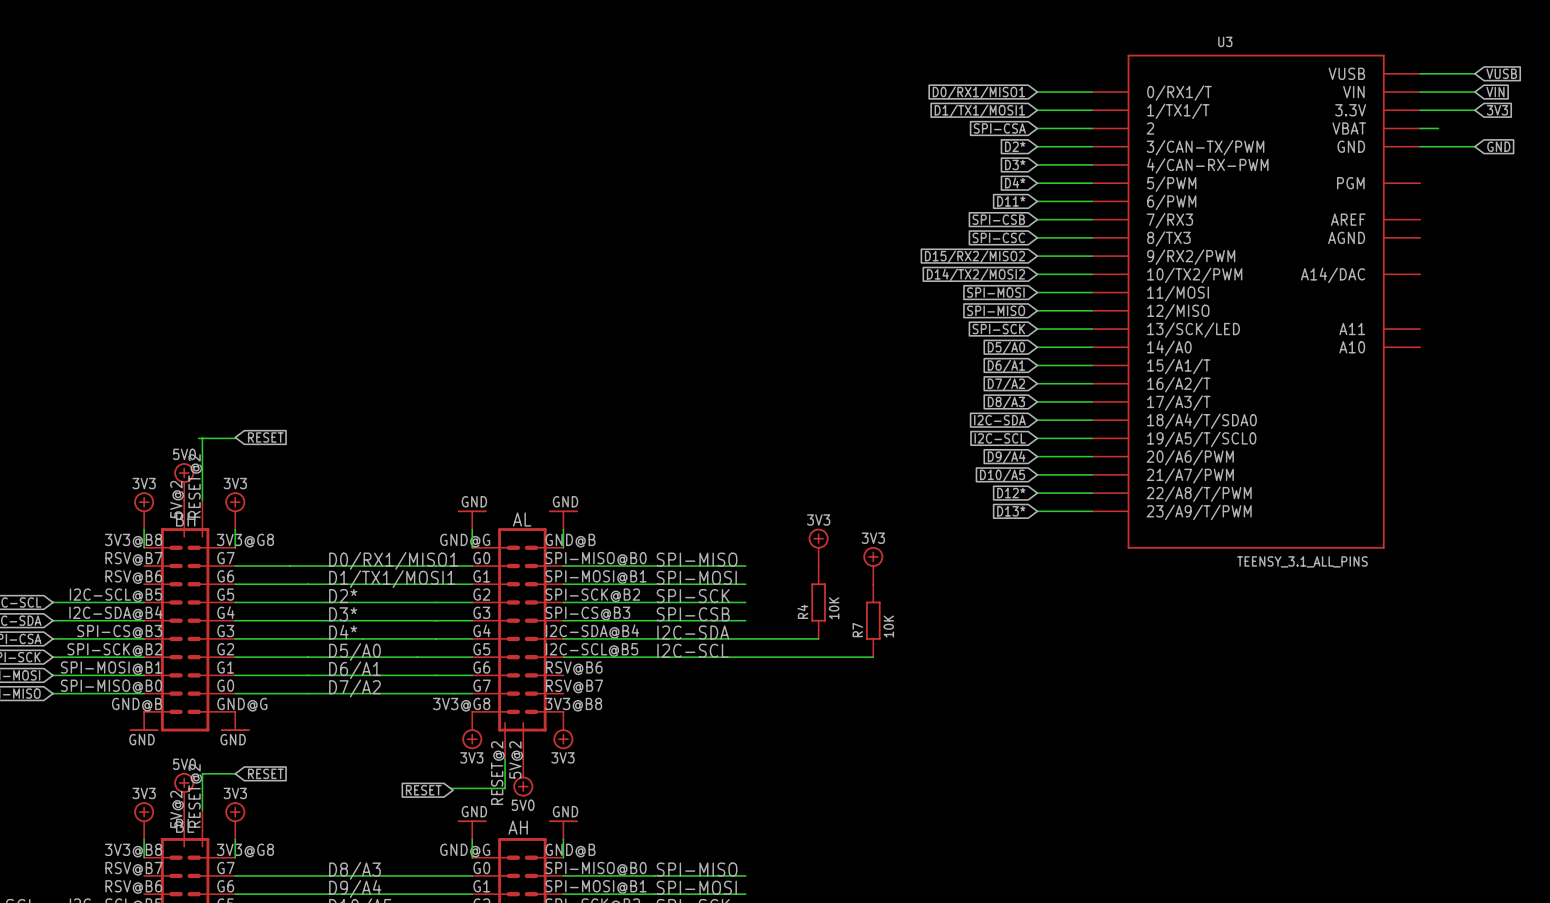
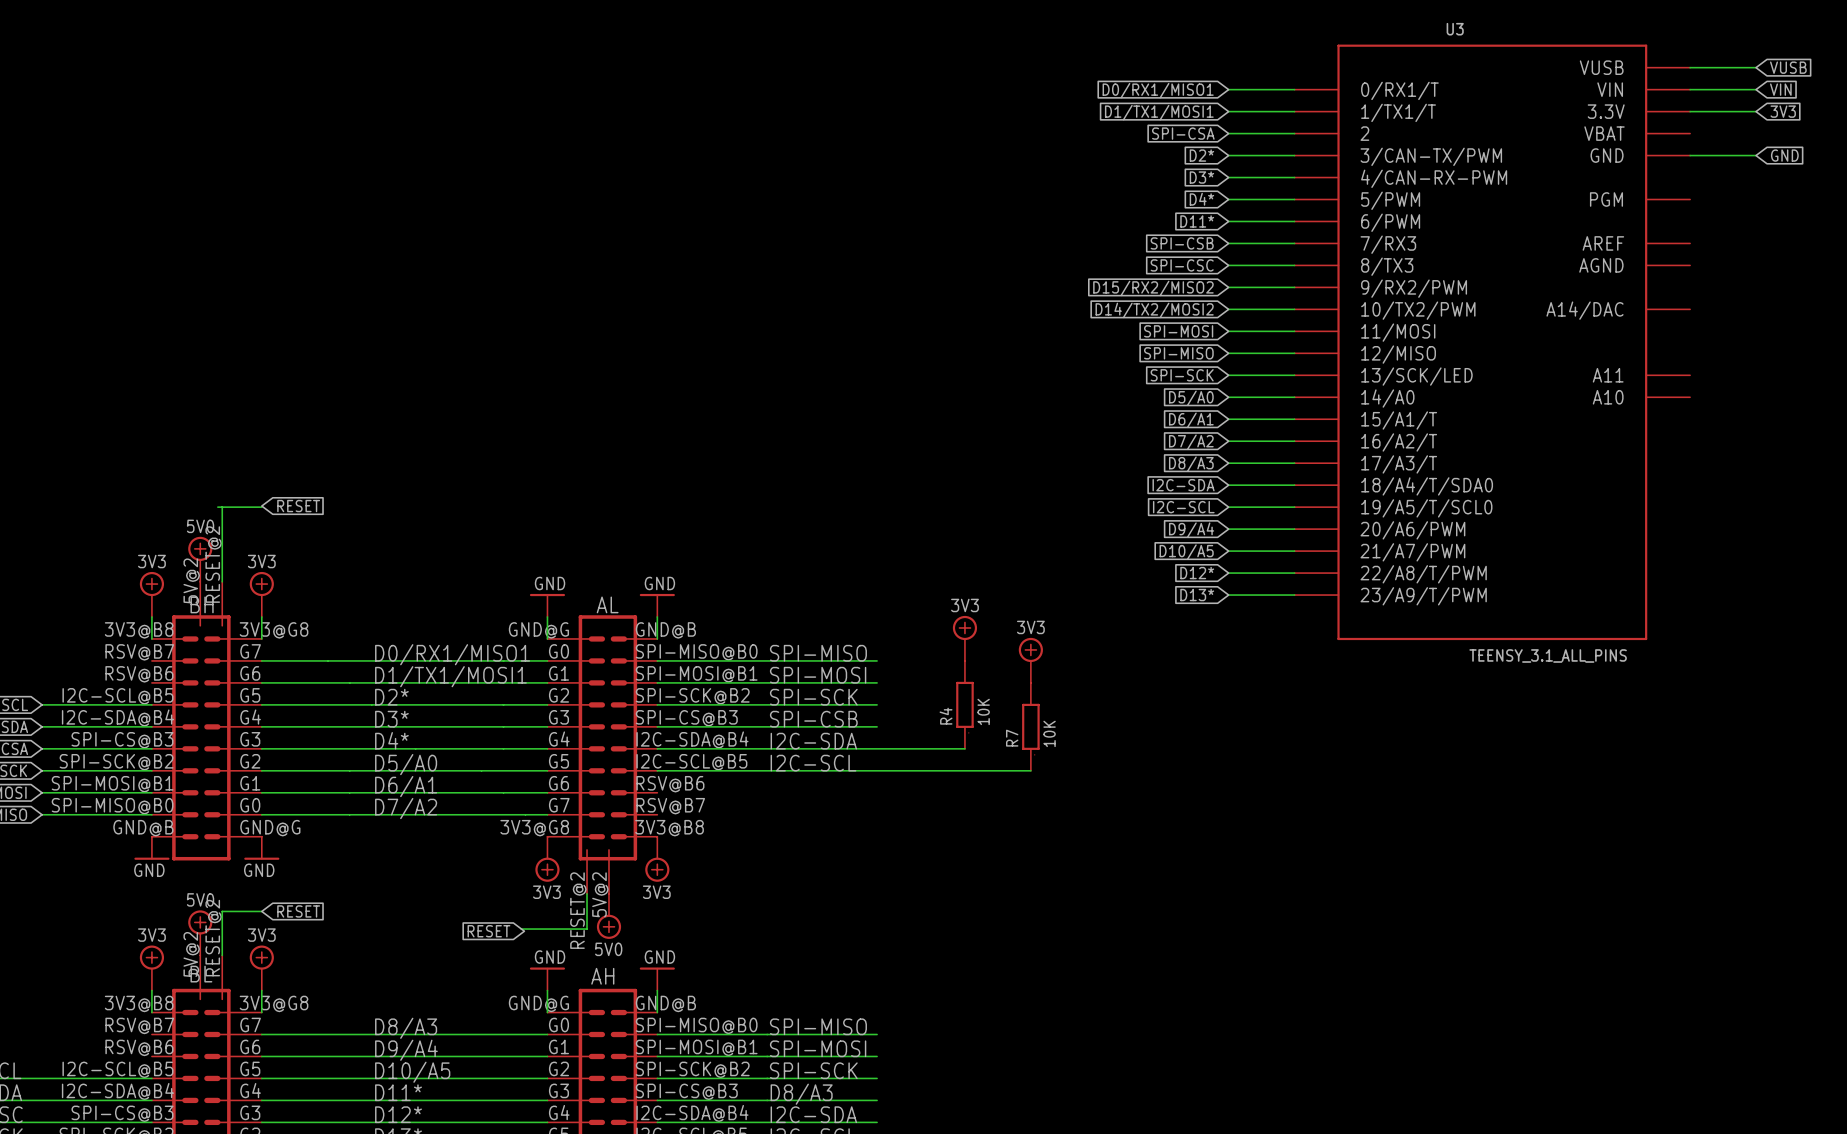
wire: (1420, 128) (1438, 128) -> none

